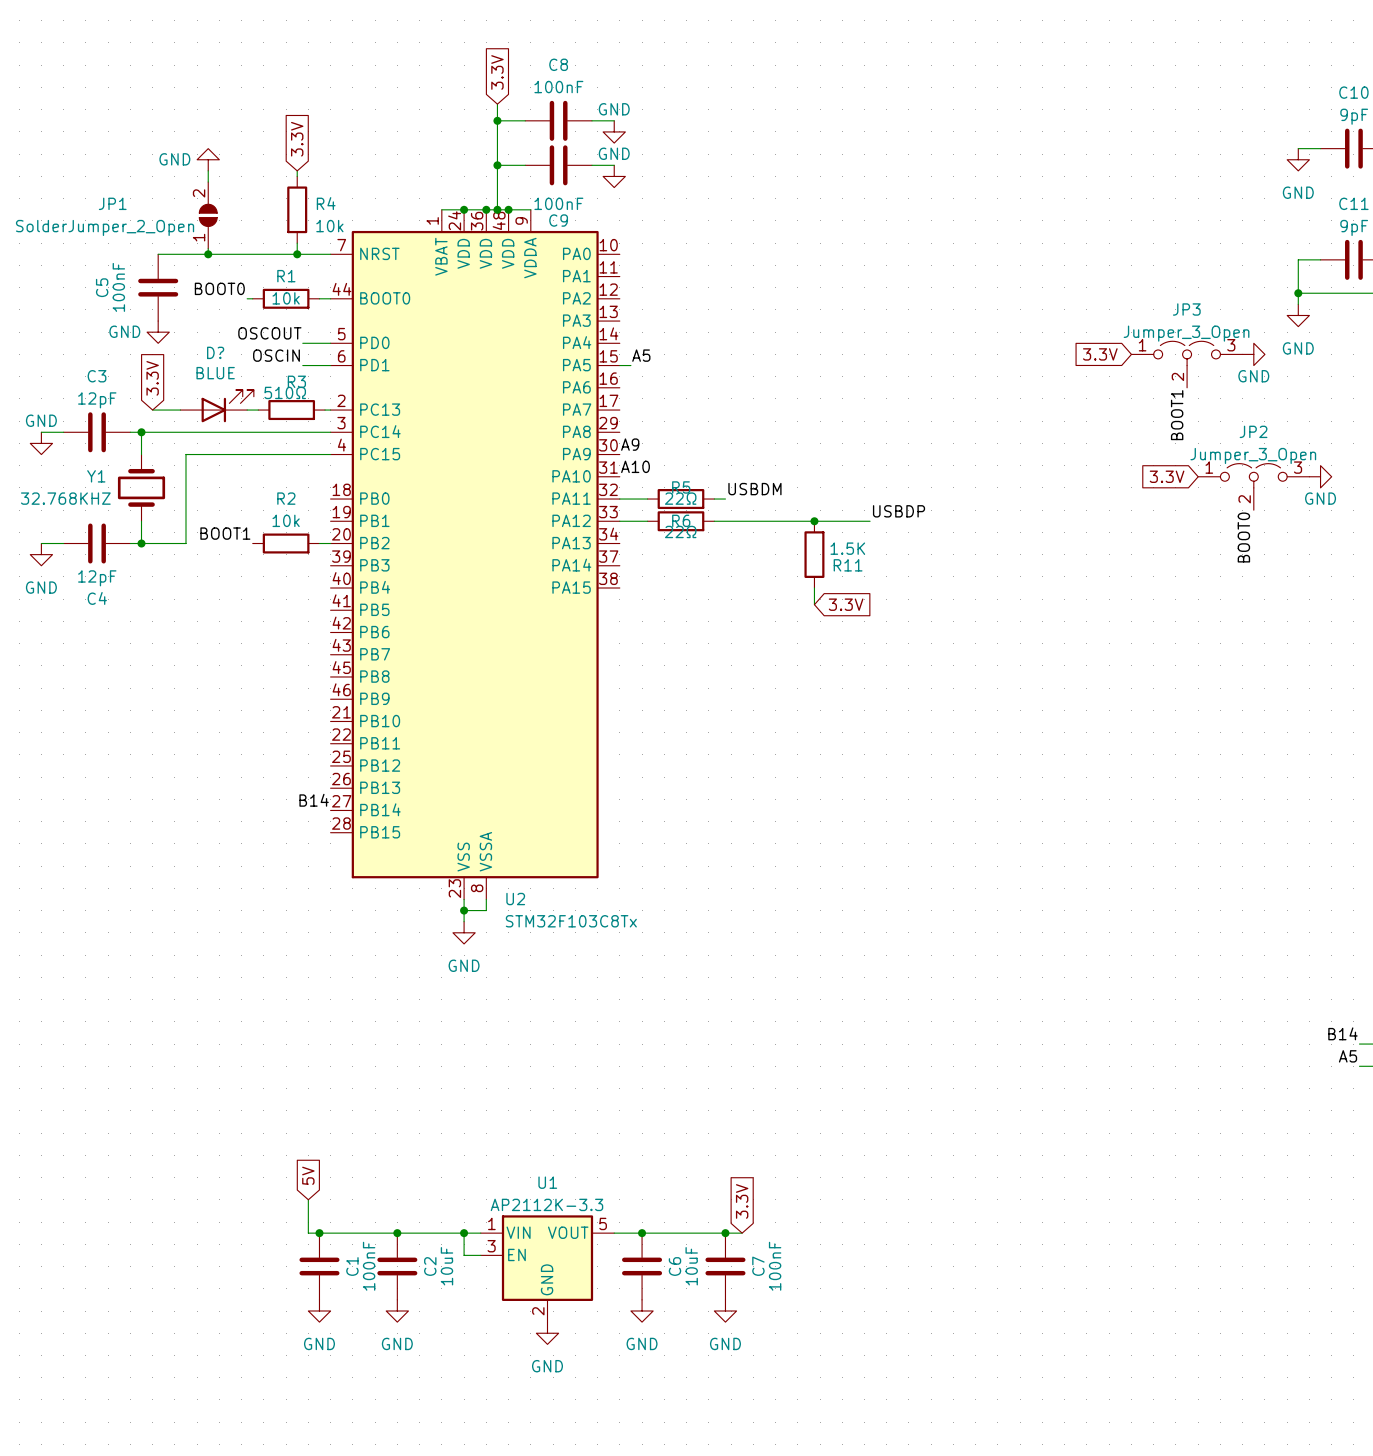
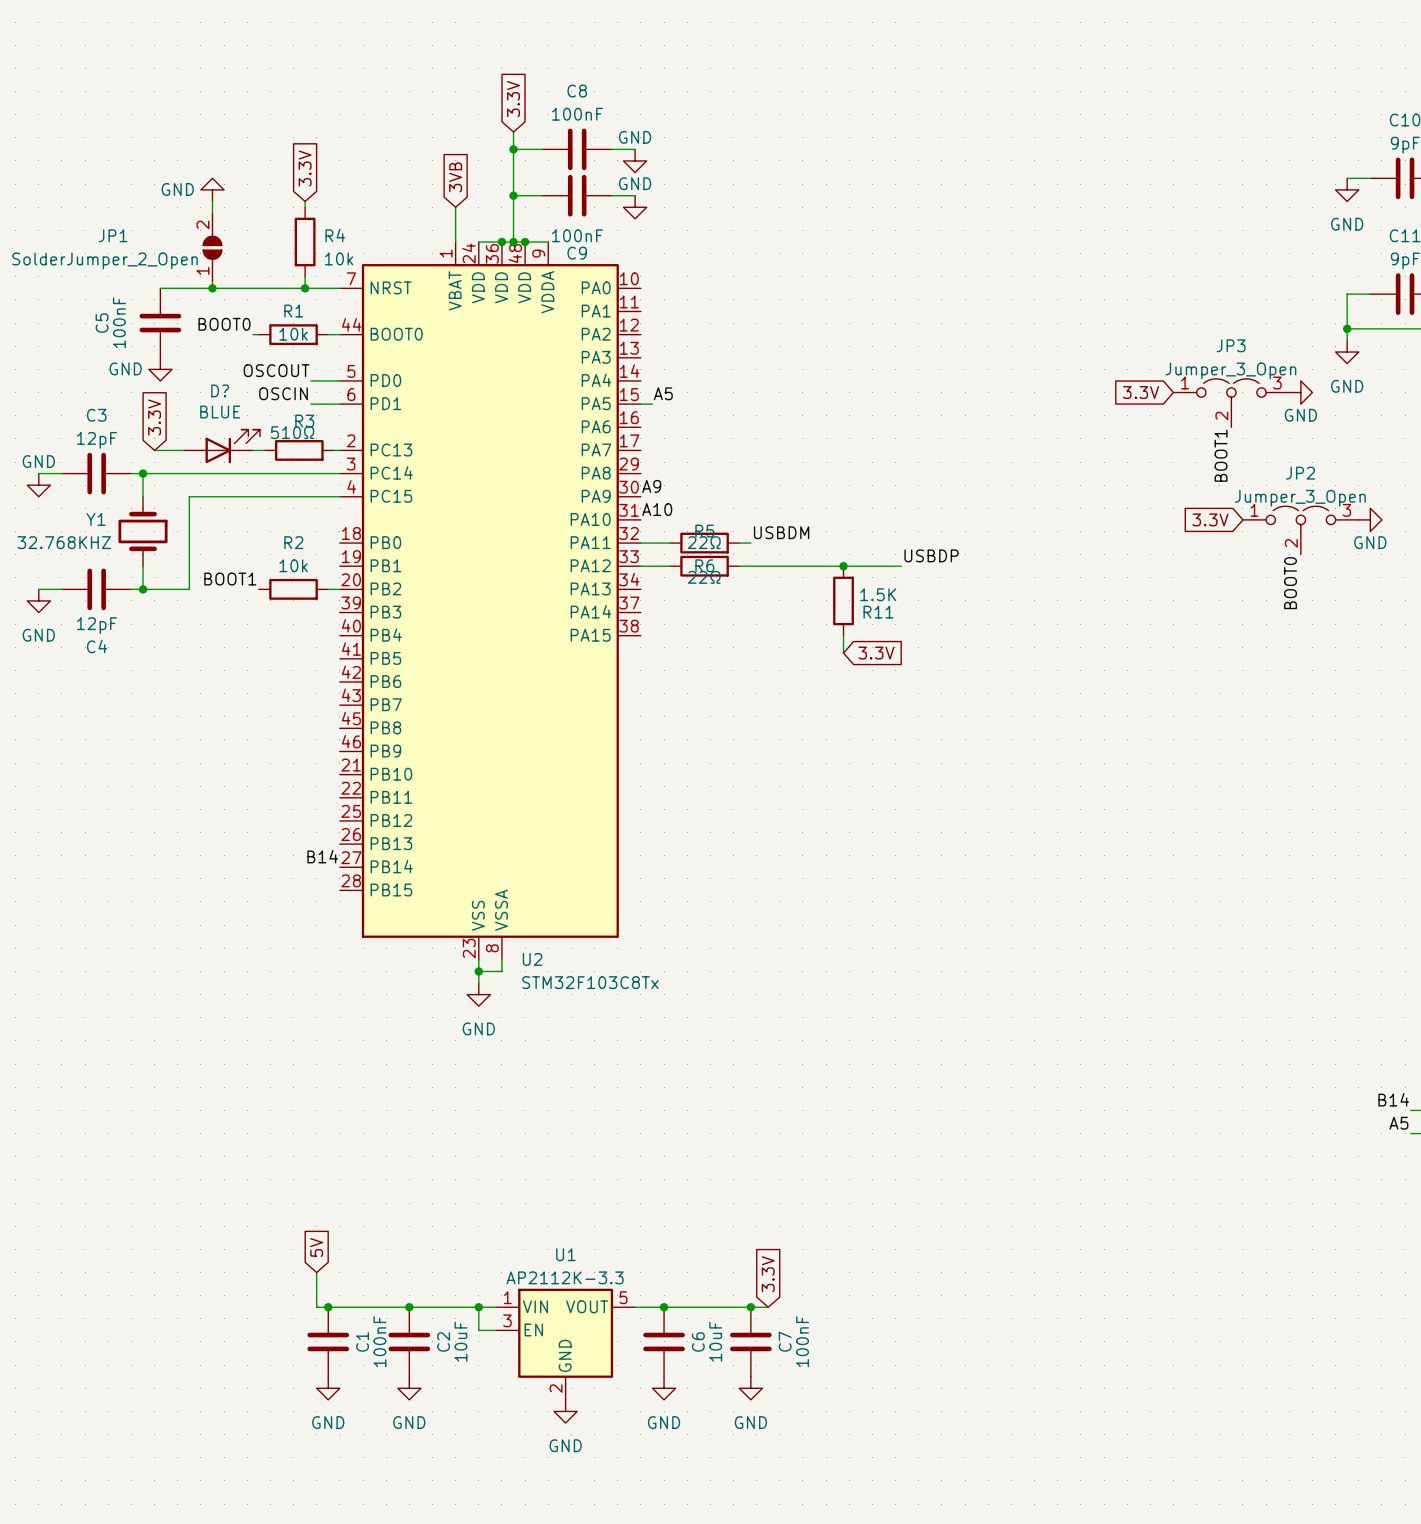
global label: none -> 3VB (455, 177)
wire: (441, 209) (464, 209) -> (455, 242) (455, 207)
junction: (464, 209) -> none

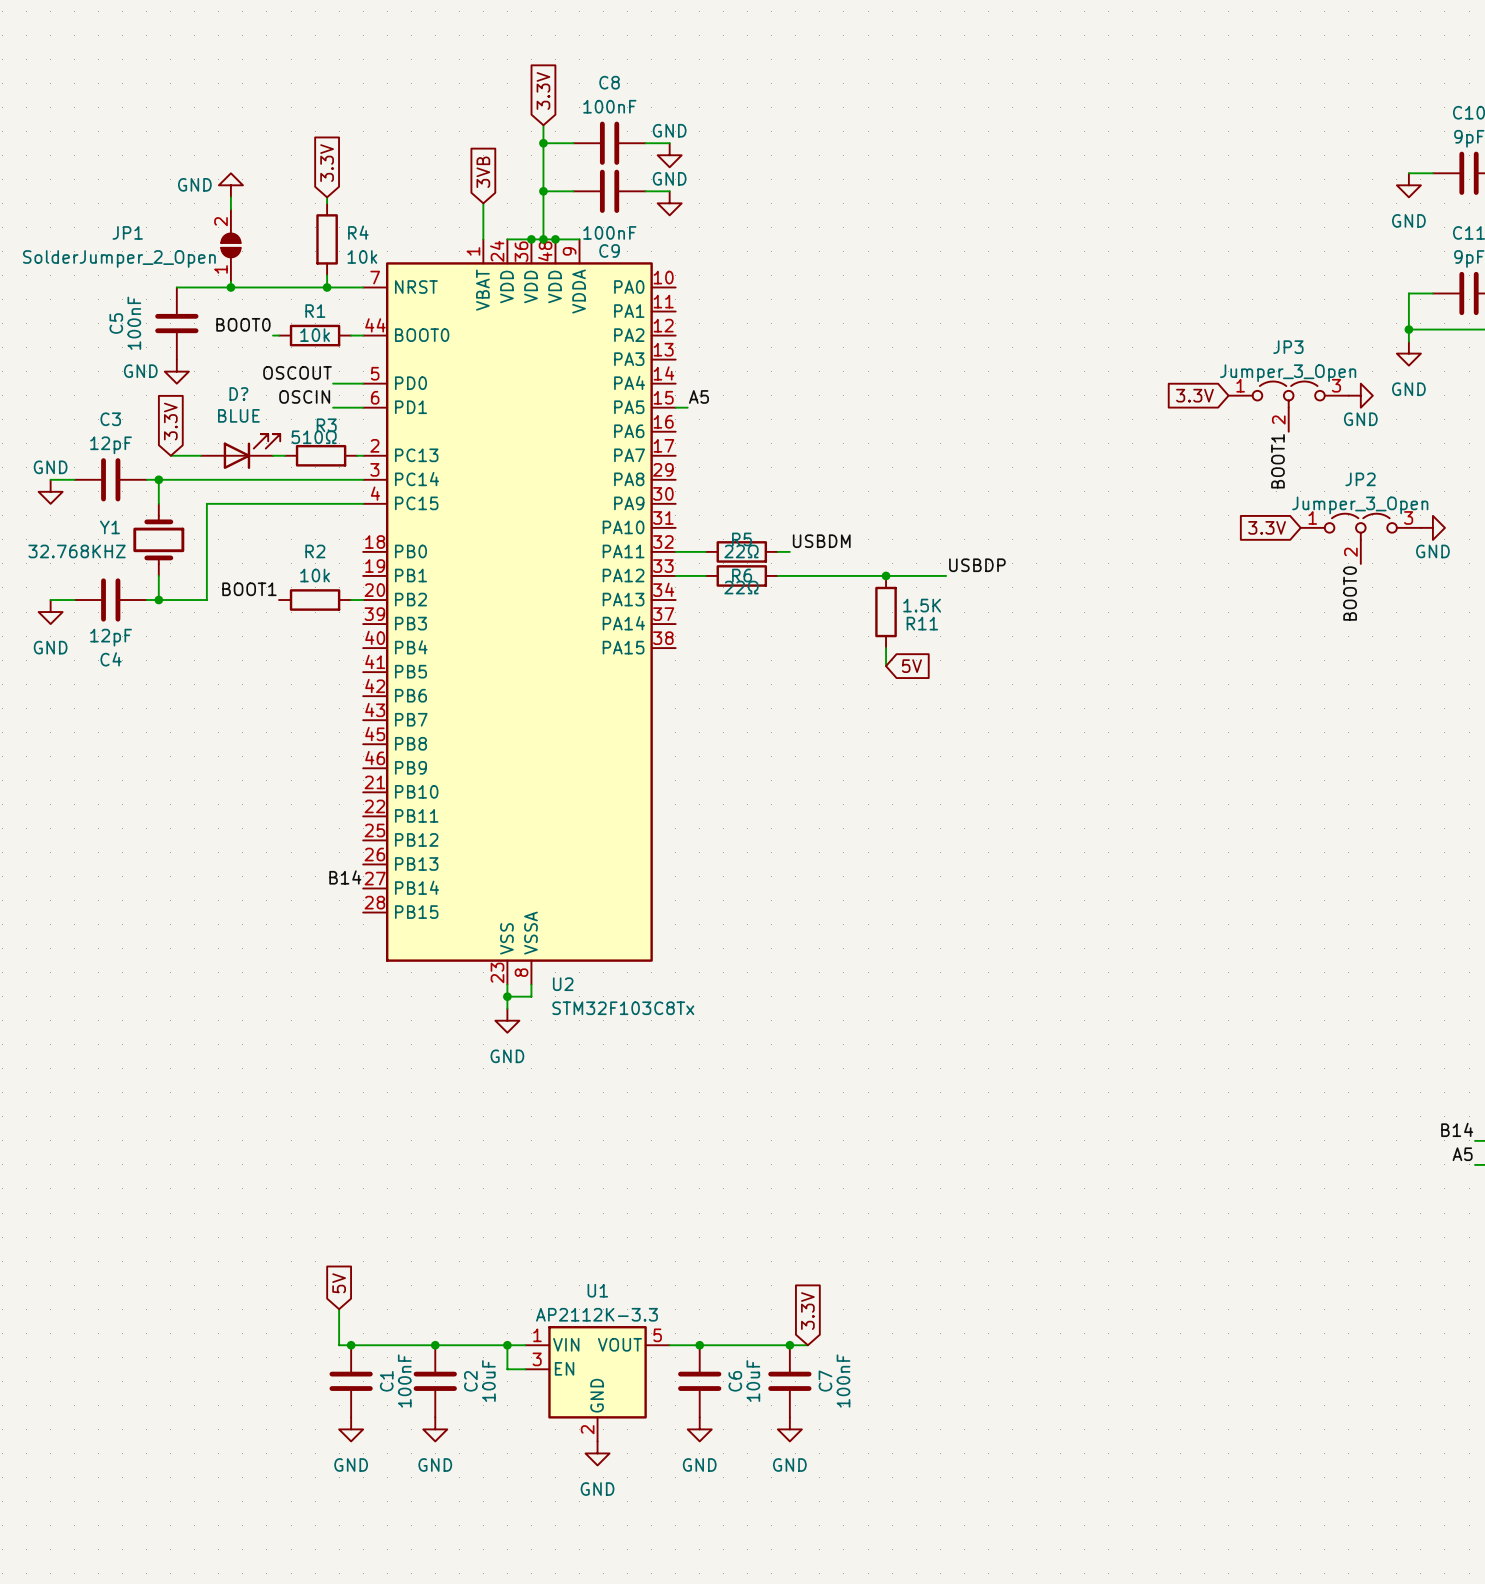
label: A9 (651, 486) -> none
label: A10 (657, 509) -> none
global label: 3.3V (876, 653) -> 5V (911, 666)

